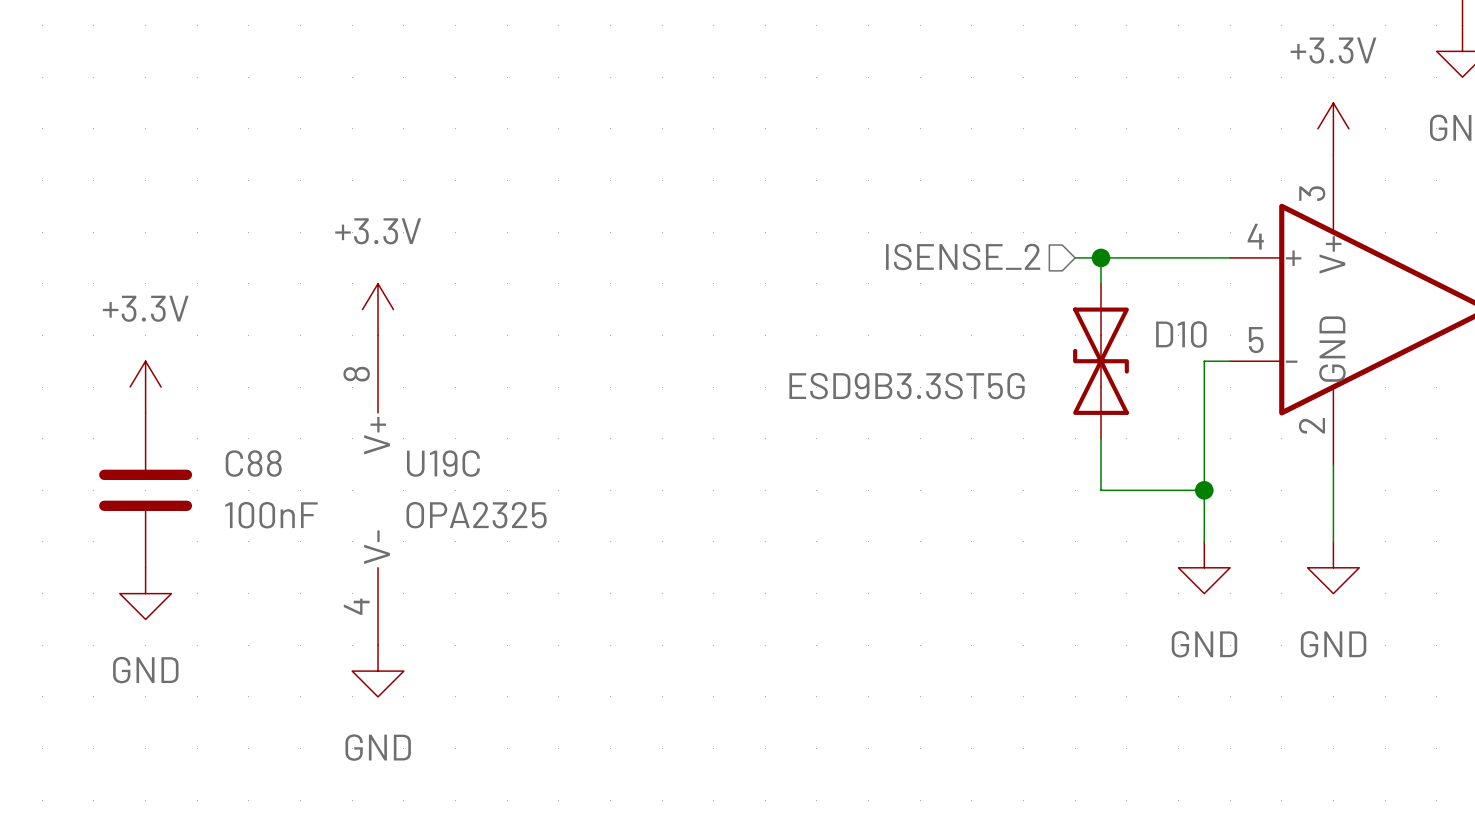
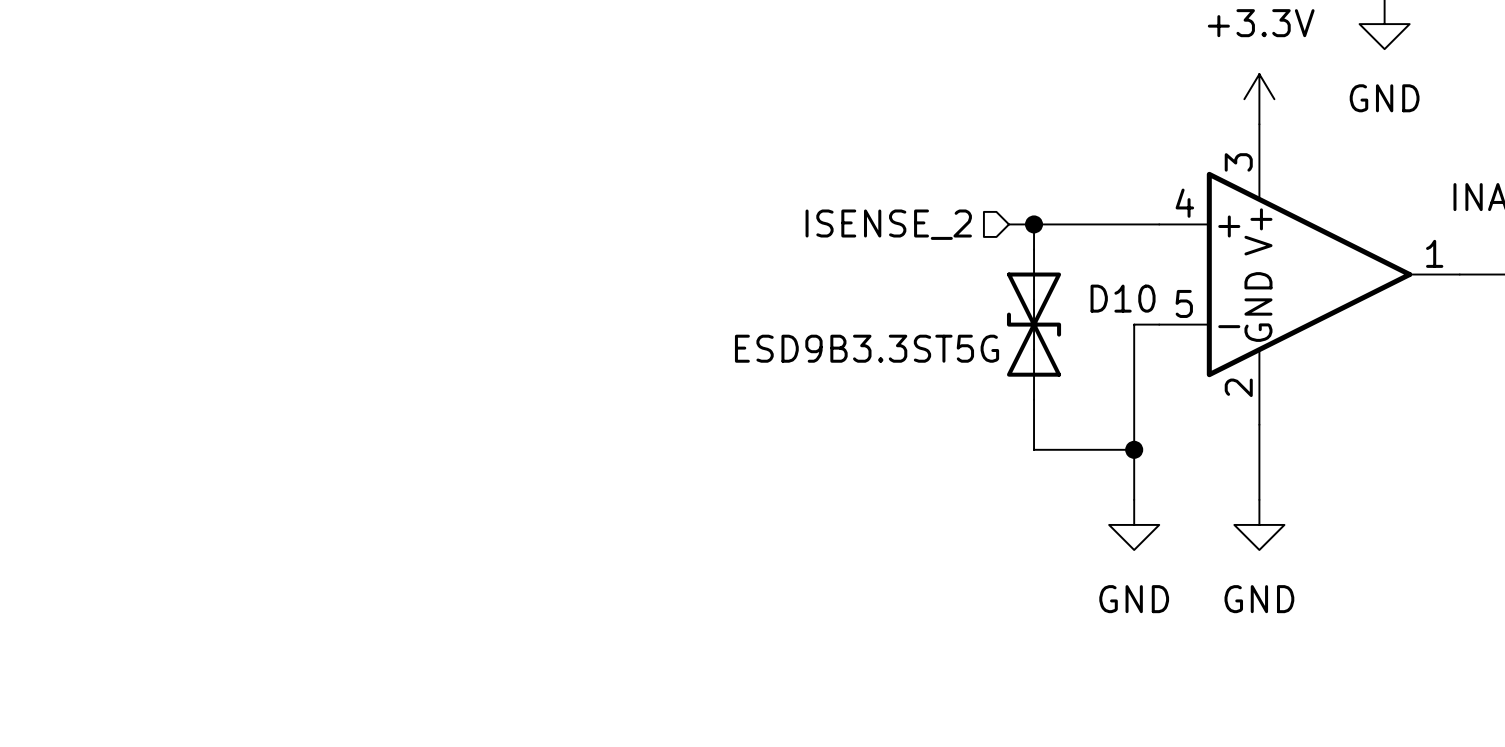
power symbol: +3.3V (378, 309) -> none
power symbol: +3.3V (145, 387) -> none
C88: 100nF (145, 490) -> none
U19C: OPA2325 (378, 490) -> none
power symbol: GND (145, 593) -> none
power symbol: GND (378, 671) -> none

